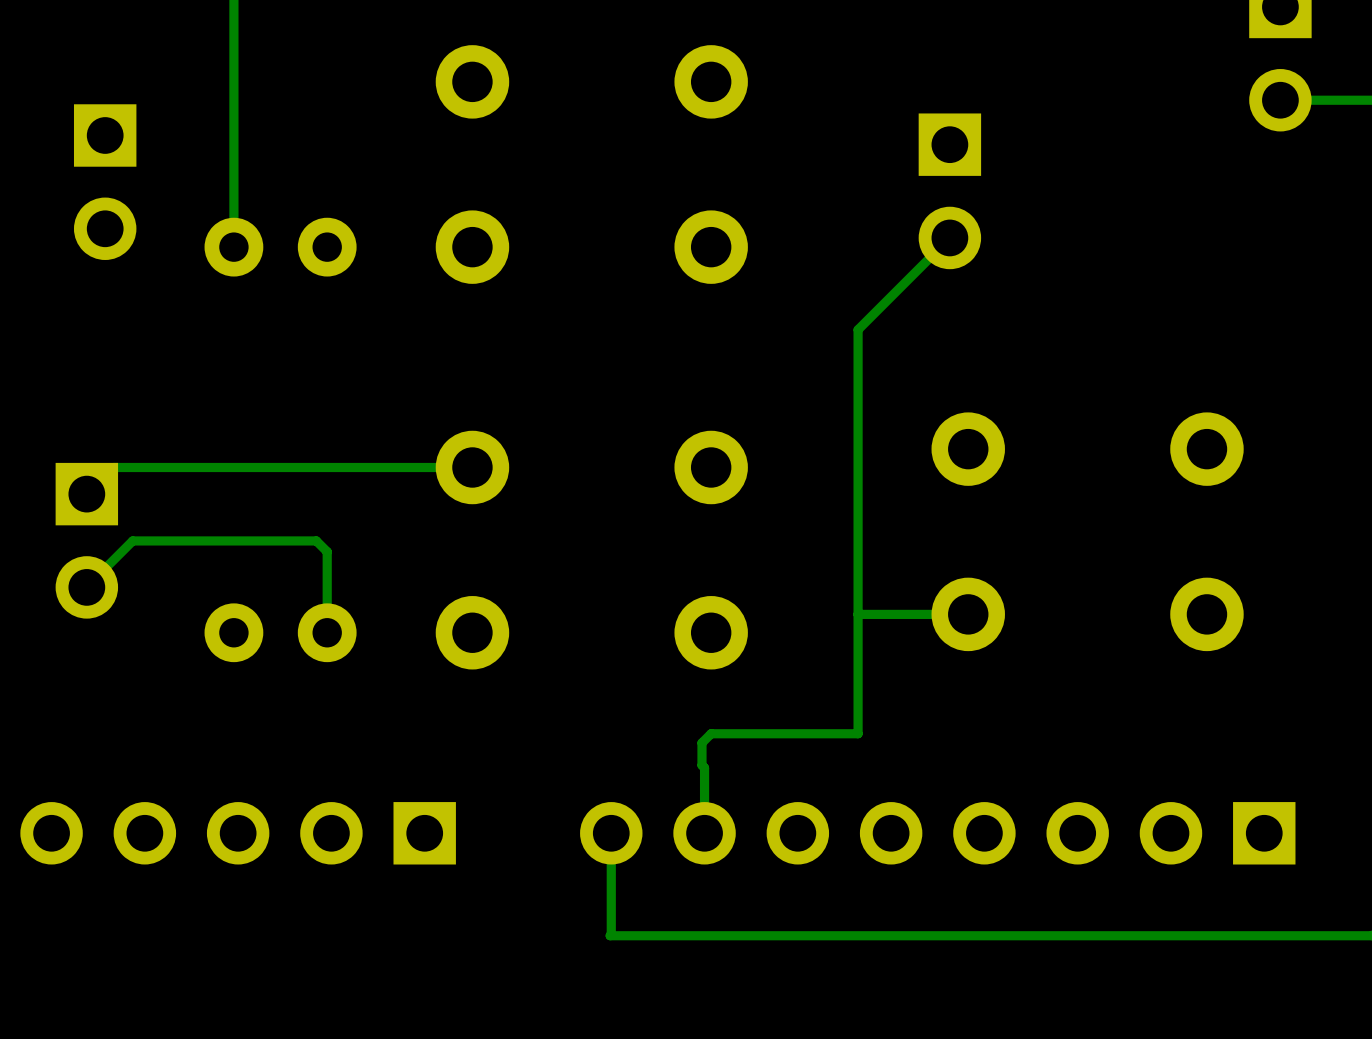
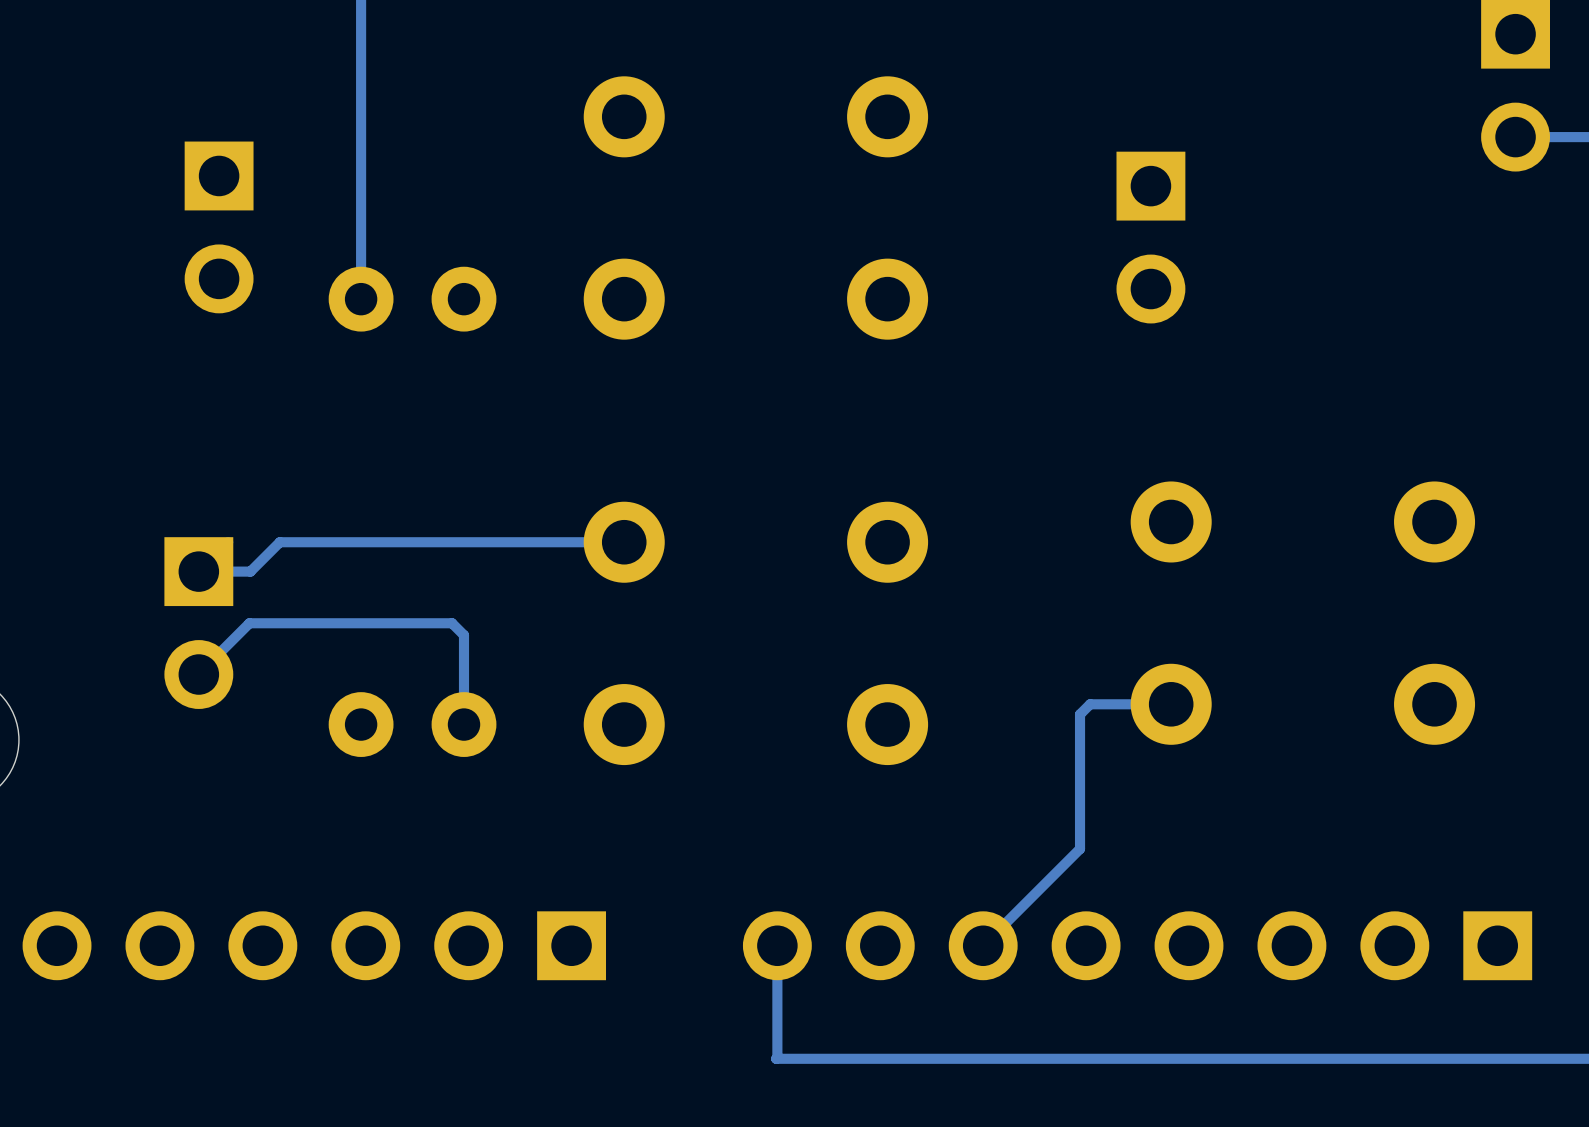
track: (949, 237) (858, 329) (858, 733) (711, 733) (701, 742) (701, 765) (704, 767) (704, 833) -> none
track: (160, 467) (113, 467) -> (279, 542) (250, 571) (198, 571)
track: (894, 614) (858, 614) -> (1090, 704) (1080, 714) (1080, 848) (983, 945)

